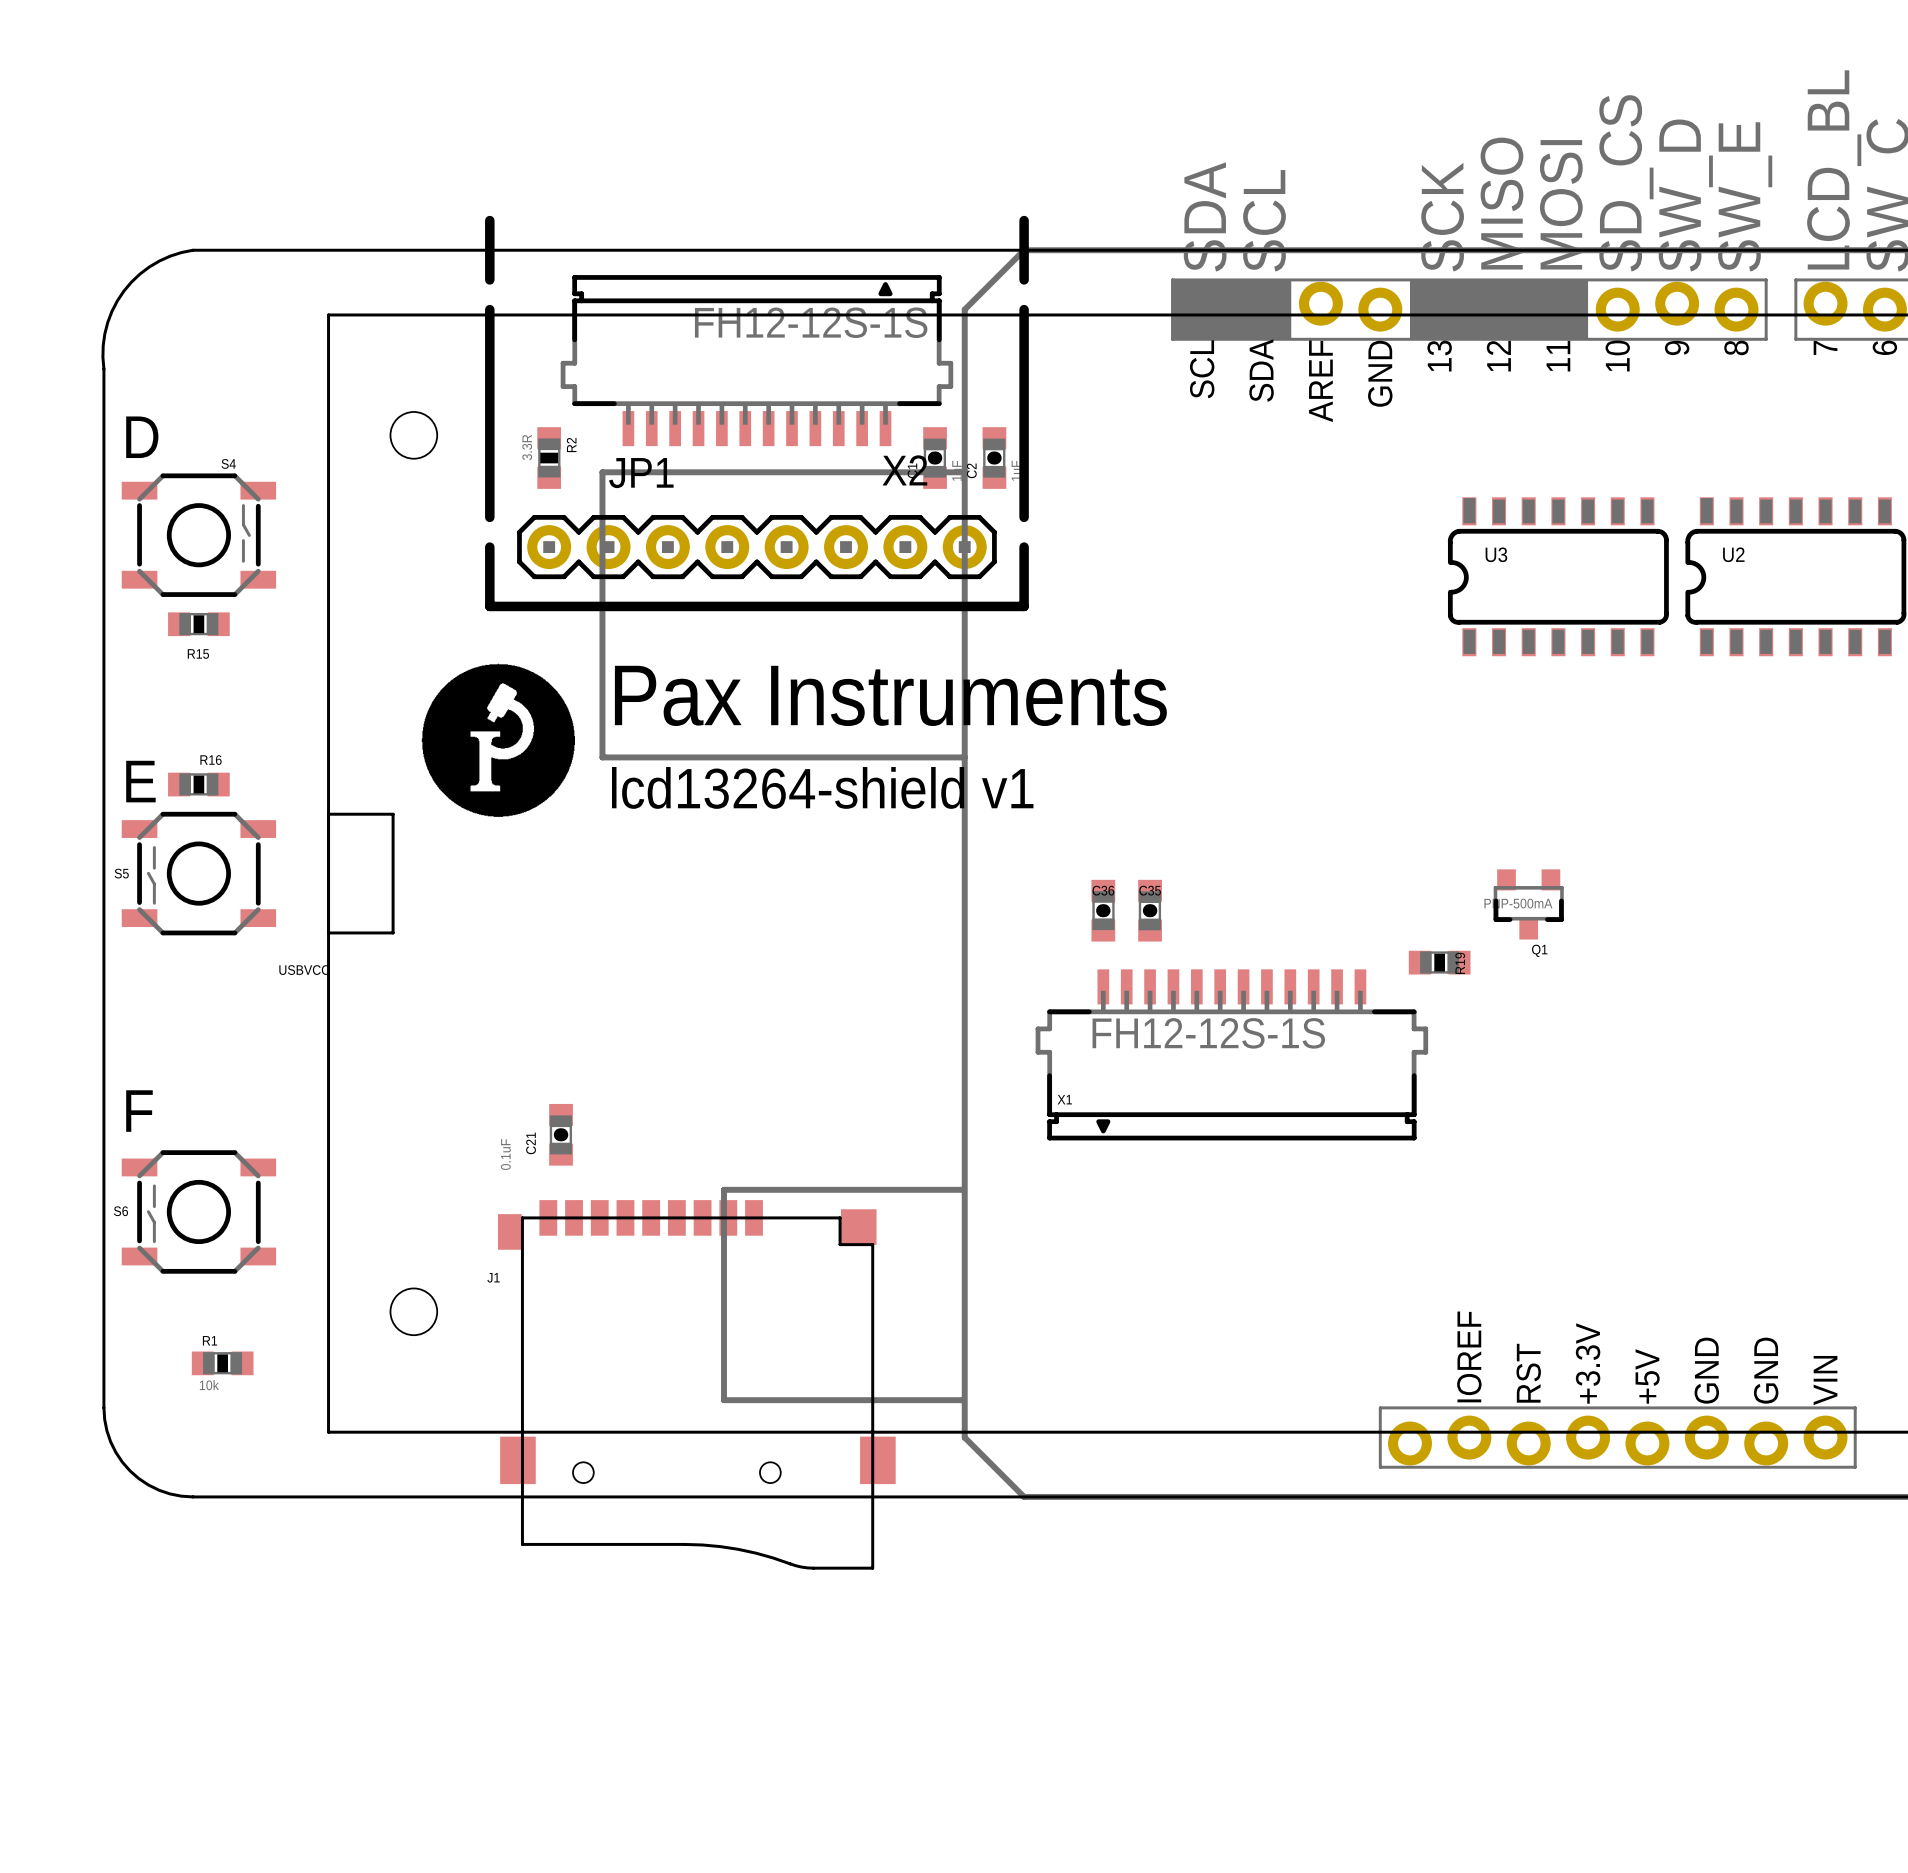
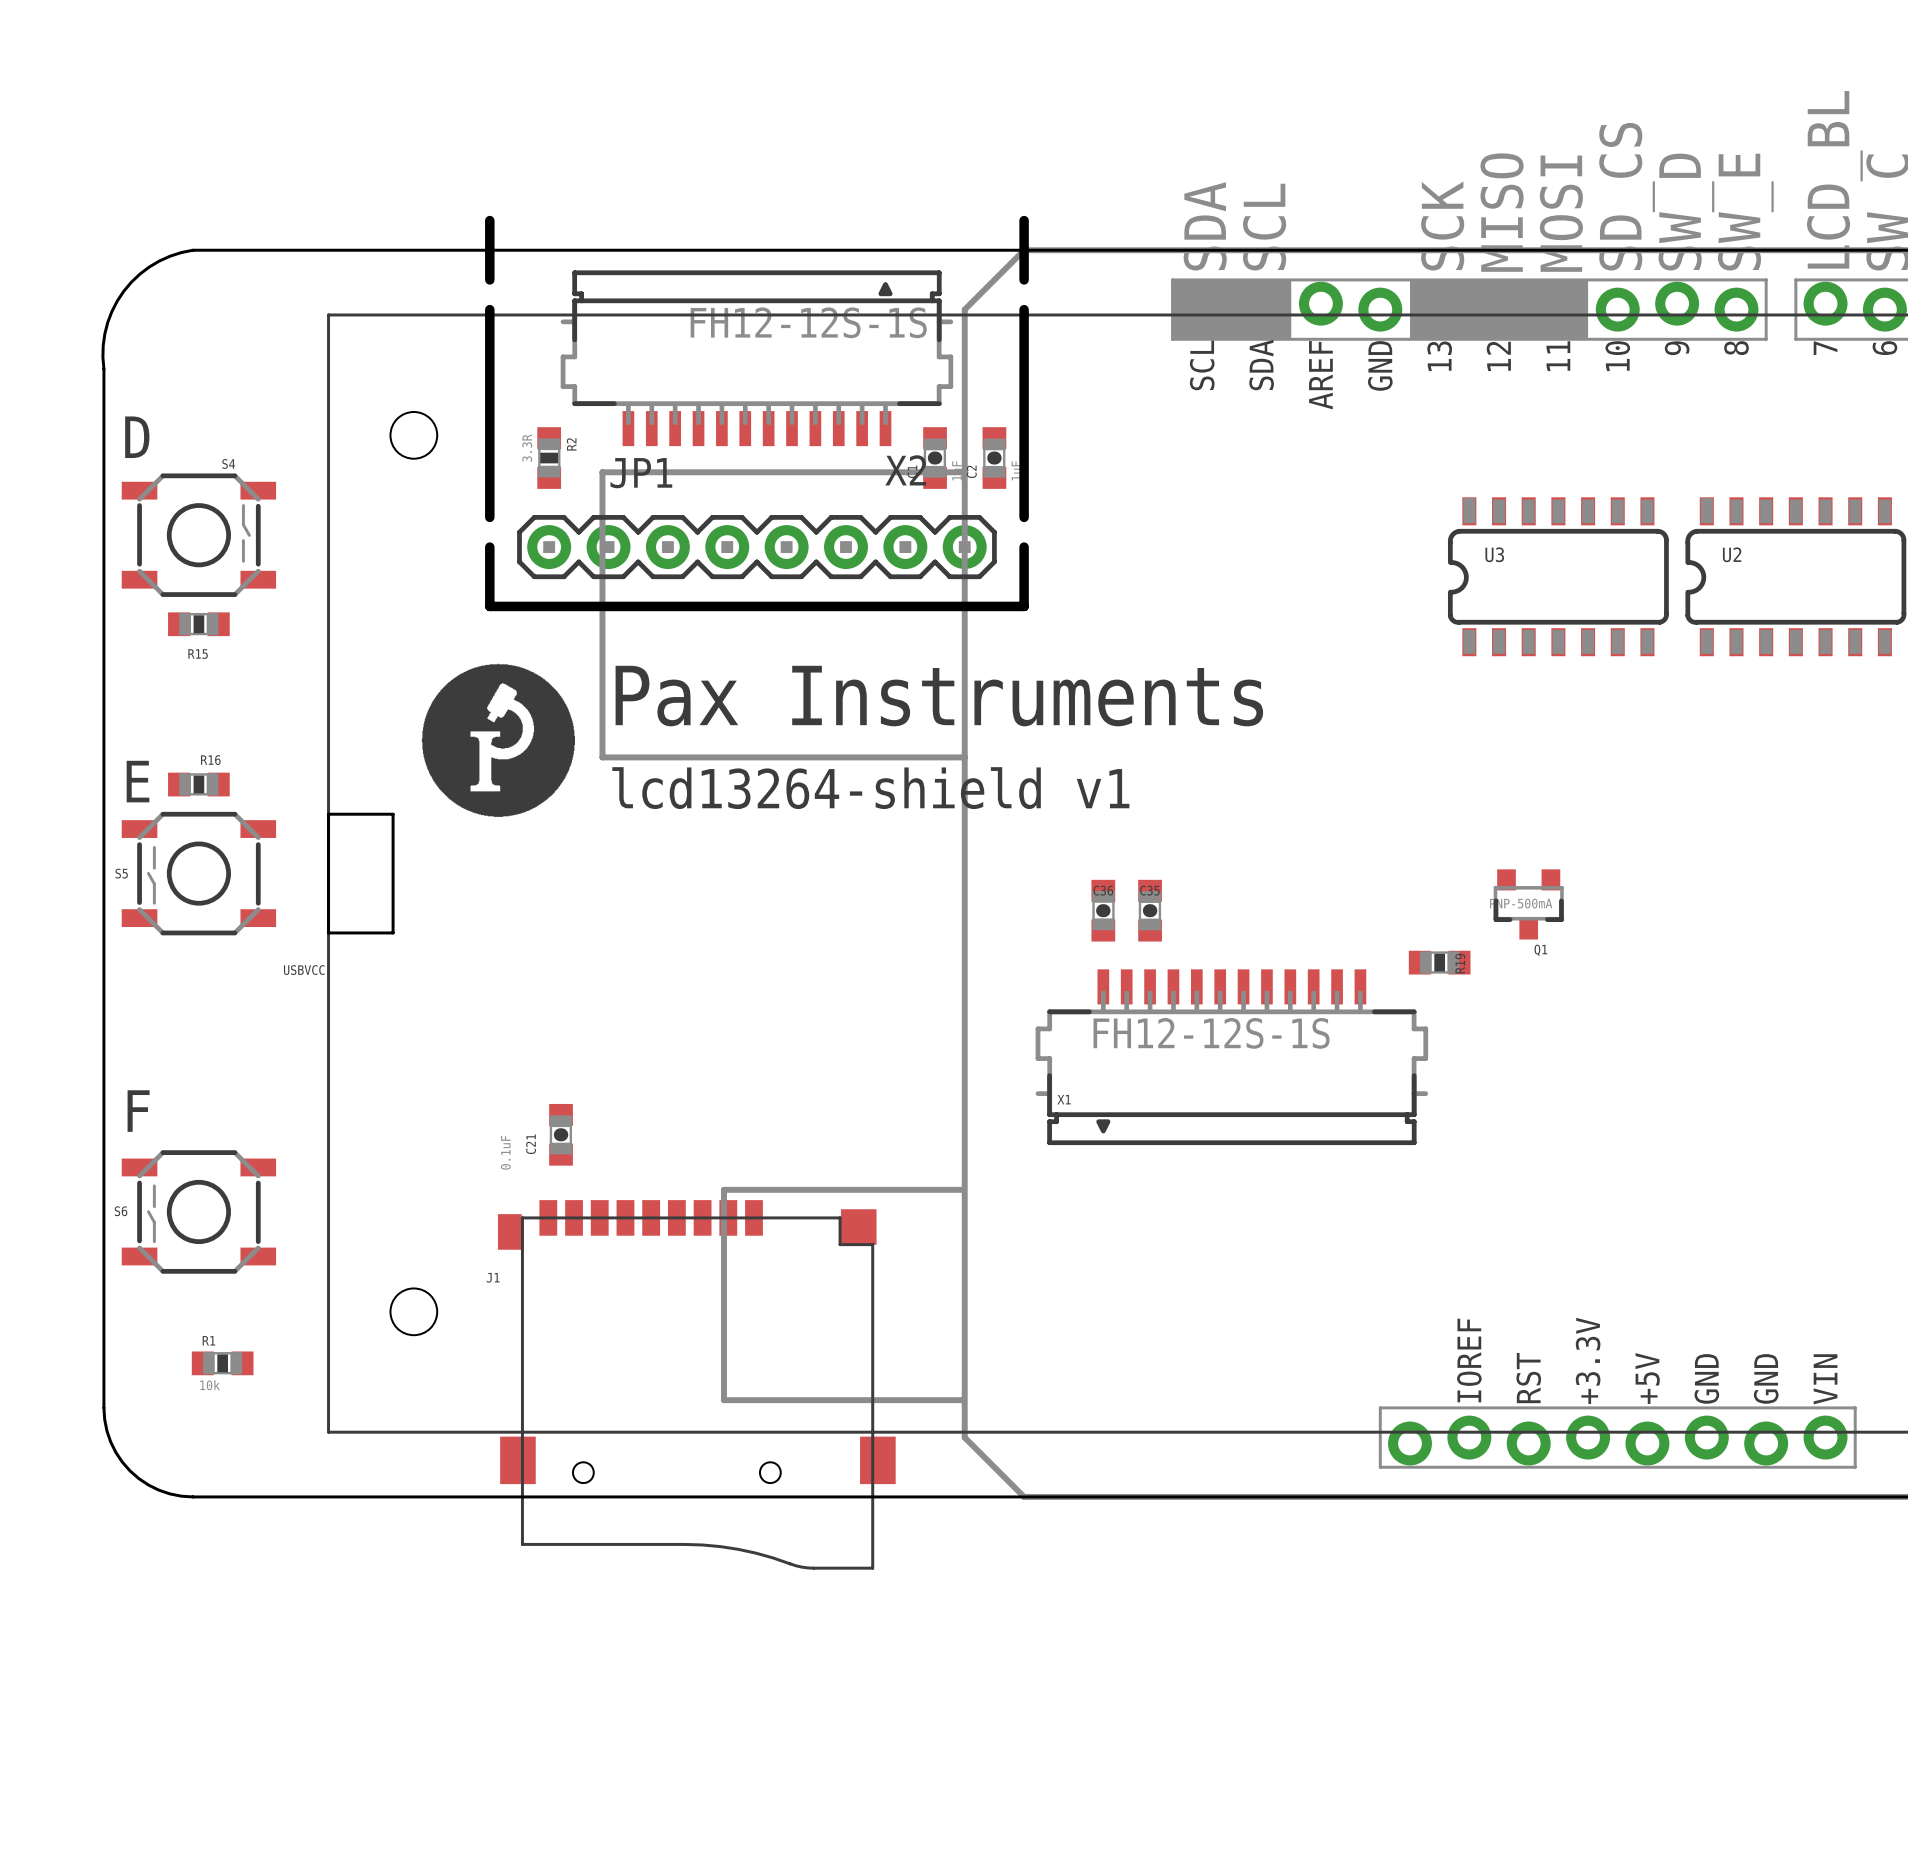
X2 footprint: [560, 275, 954, 447] -> [560, 270, 954, 447]
X1 footprint: [1035, 969, 1429, 1141] -> [1035, 969, 1429, 1146]

